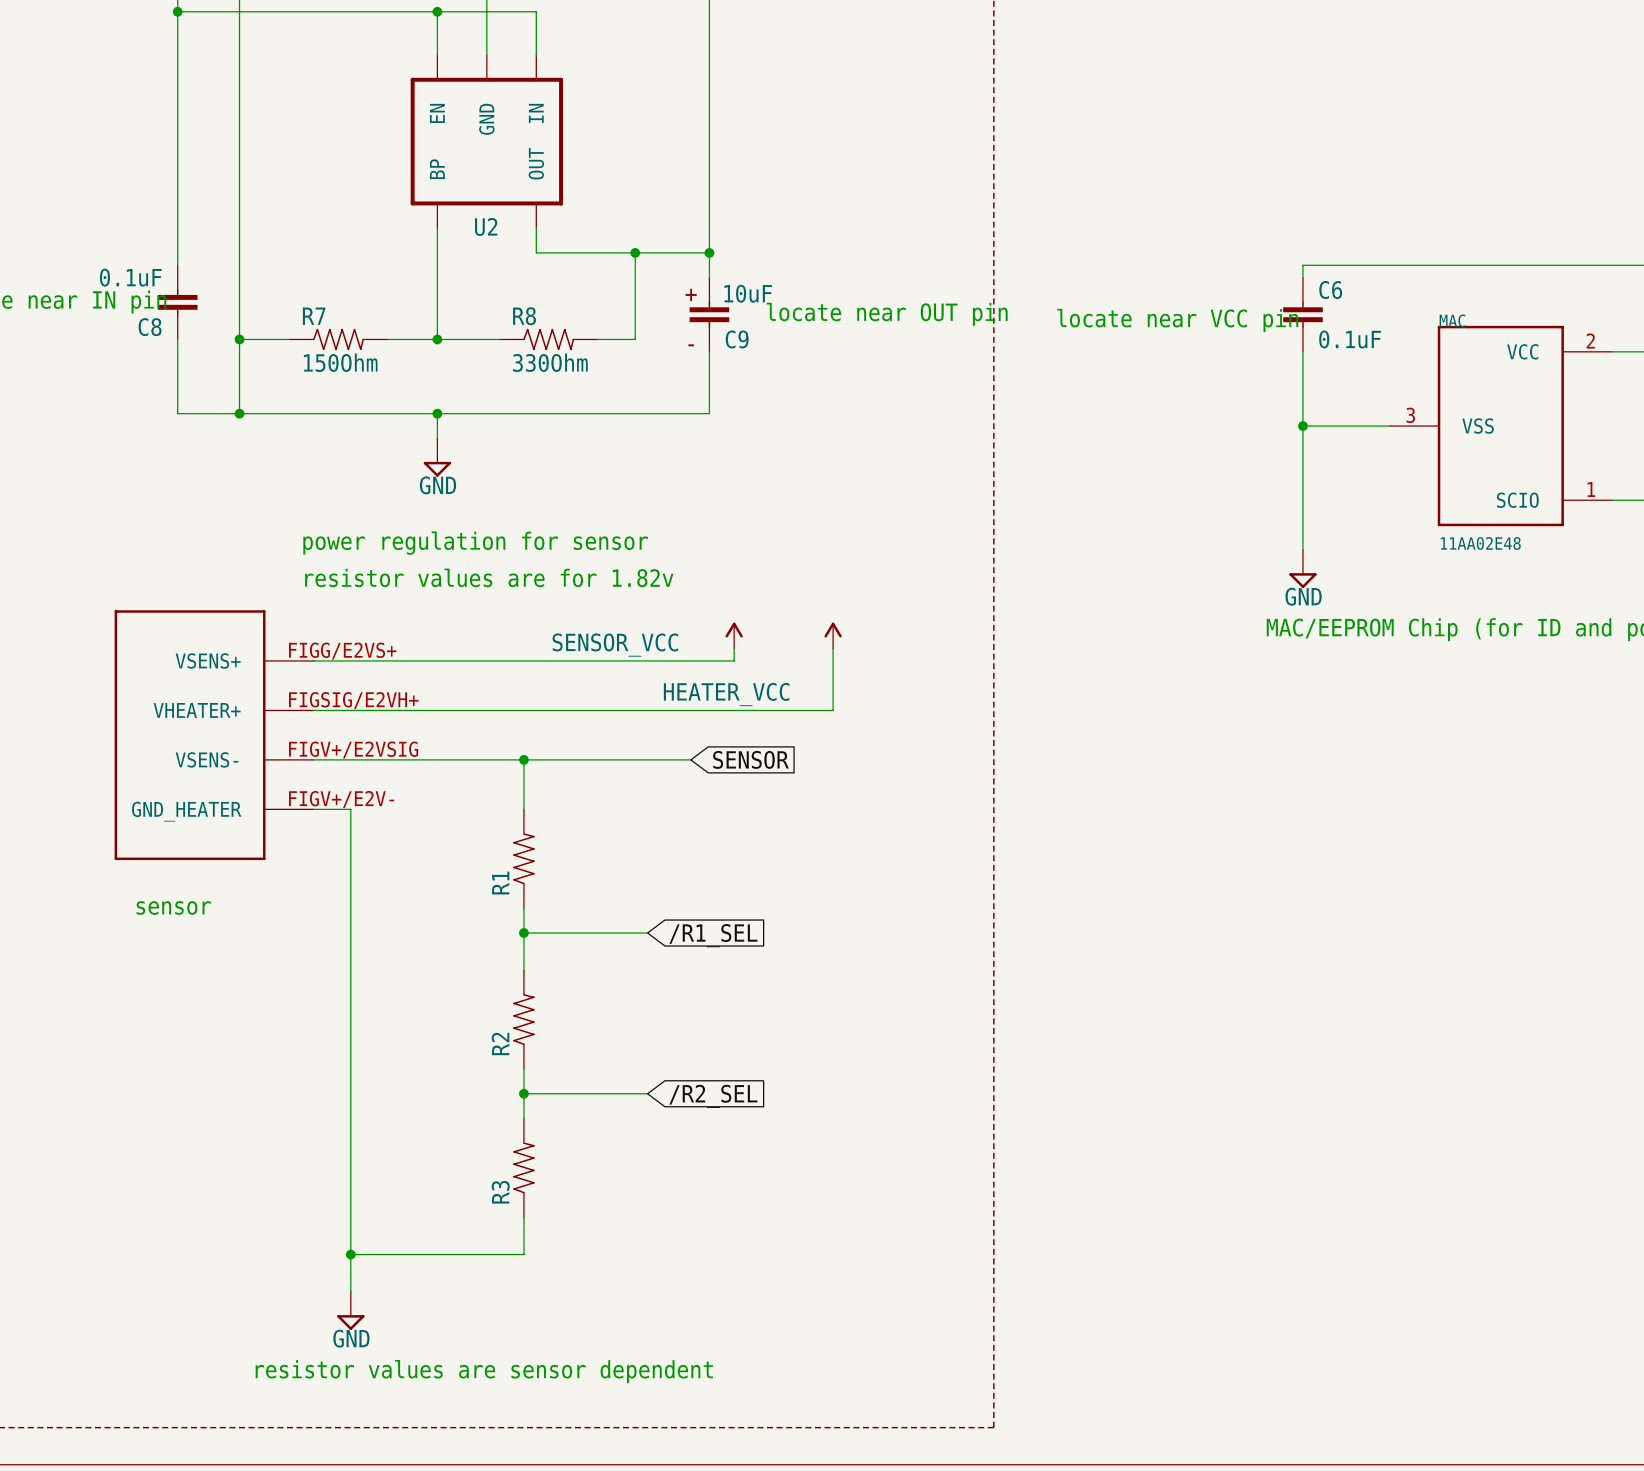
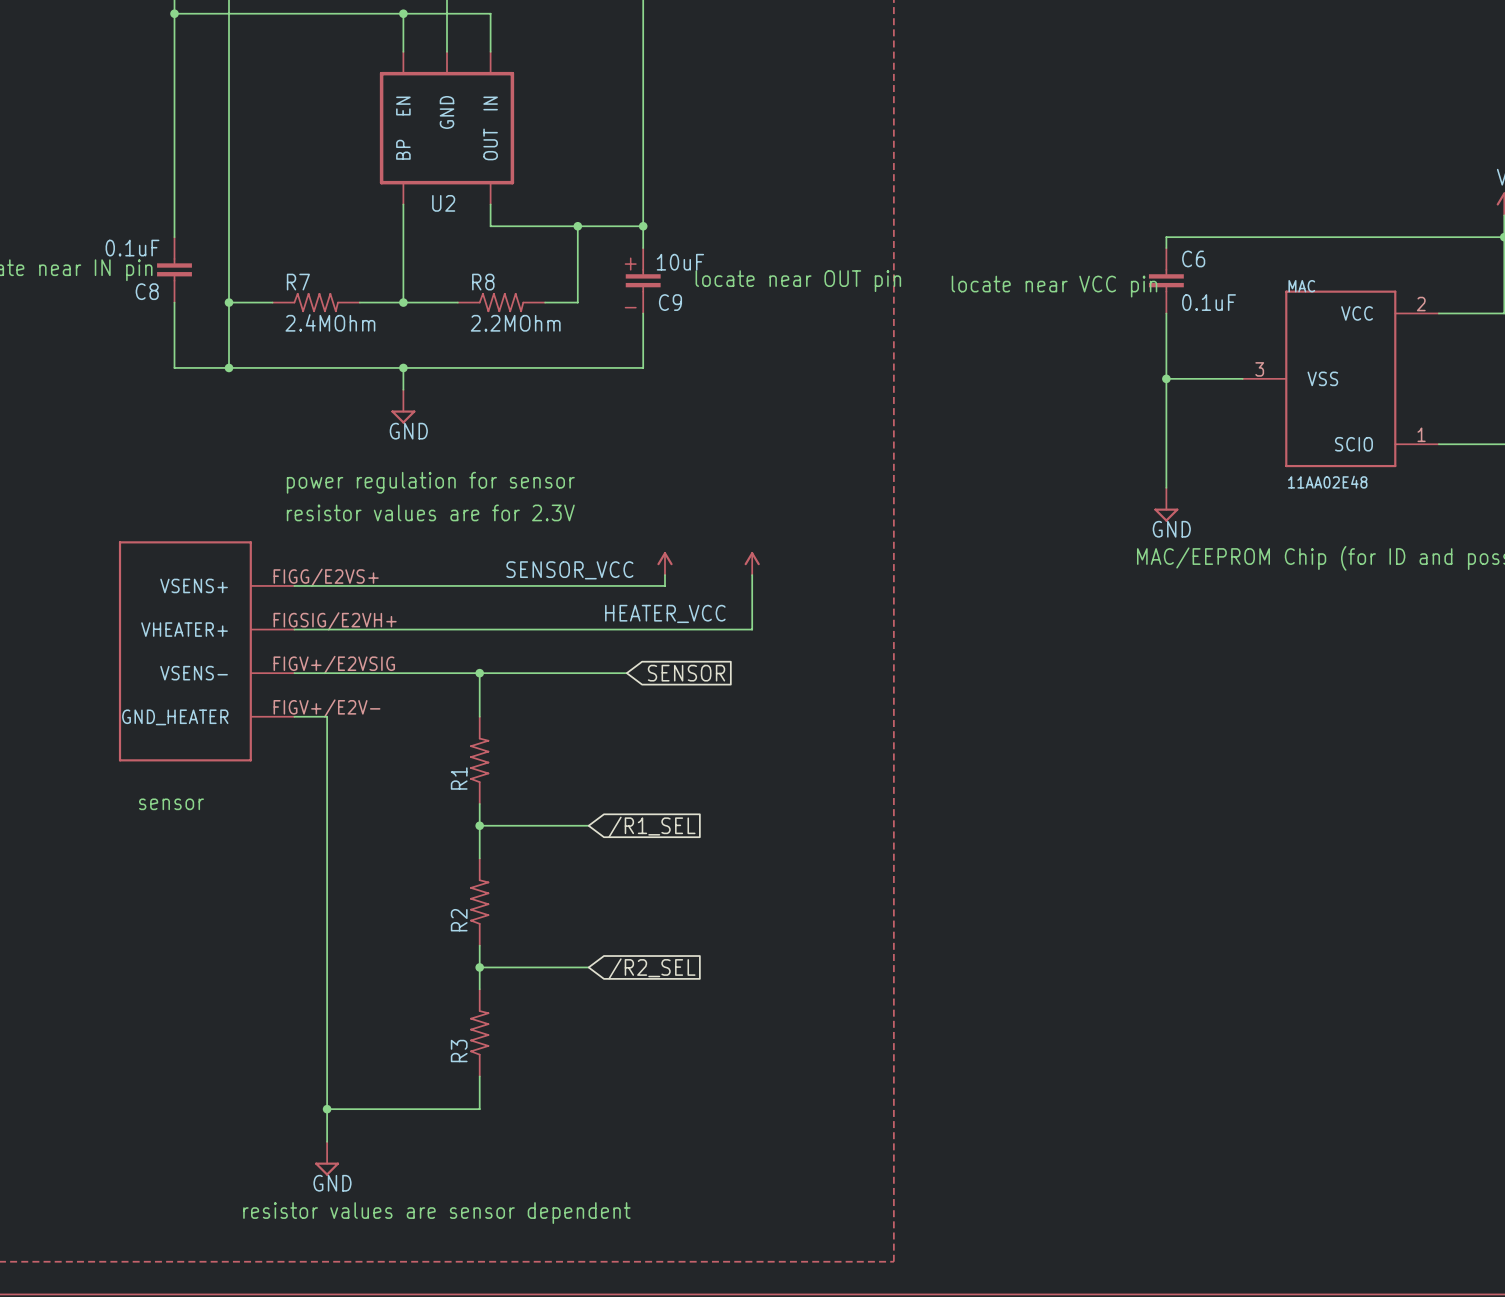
R7 value: 150Ohm (340, 362) -> 2.4MOhm (330, 322)
R8 value: 330Ohm (550, 362) -> 2.2MOhm (515, 323)
text: resistor values are for 1.82v (489, 577) -> resistor values are for 2.3V (430, 512)

